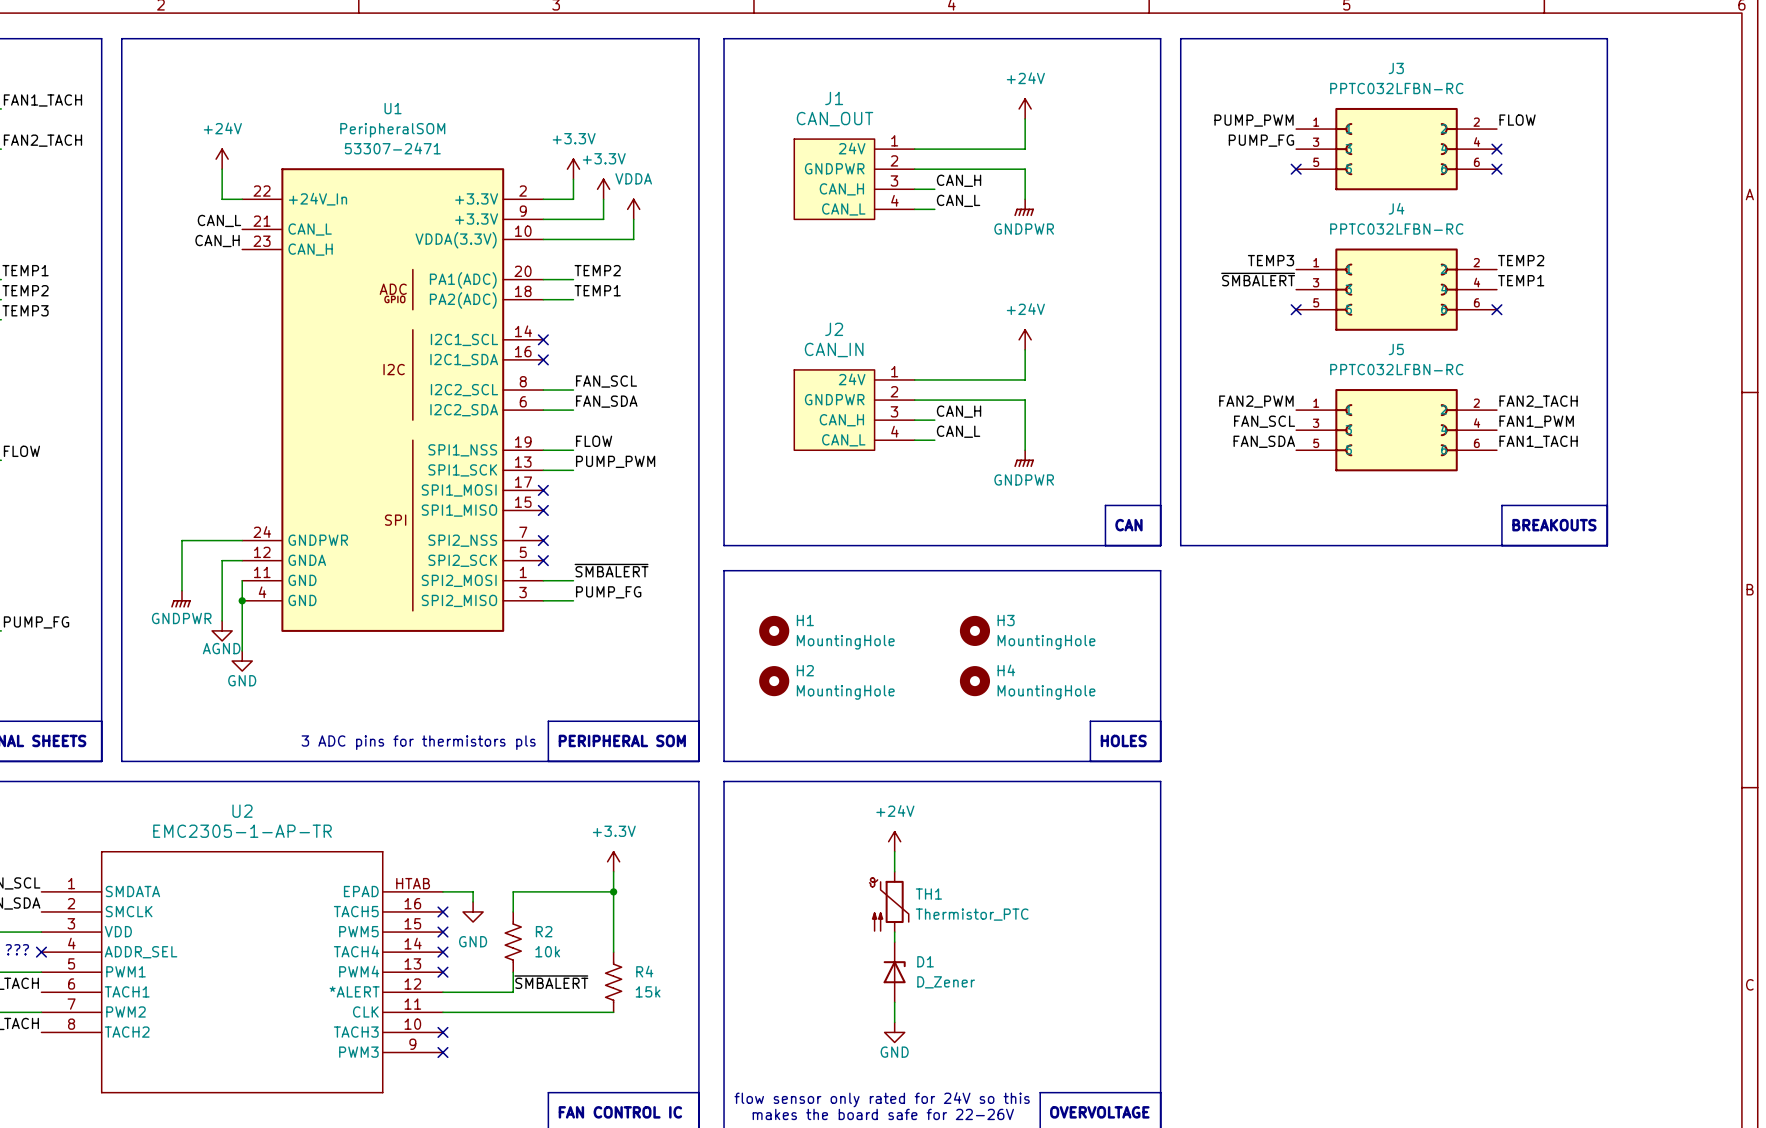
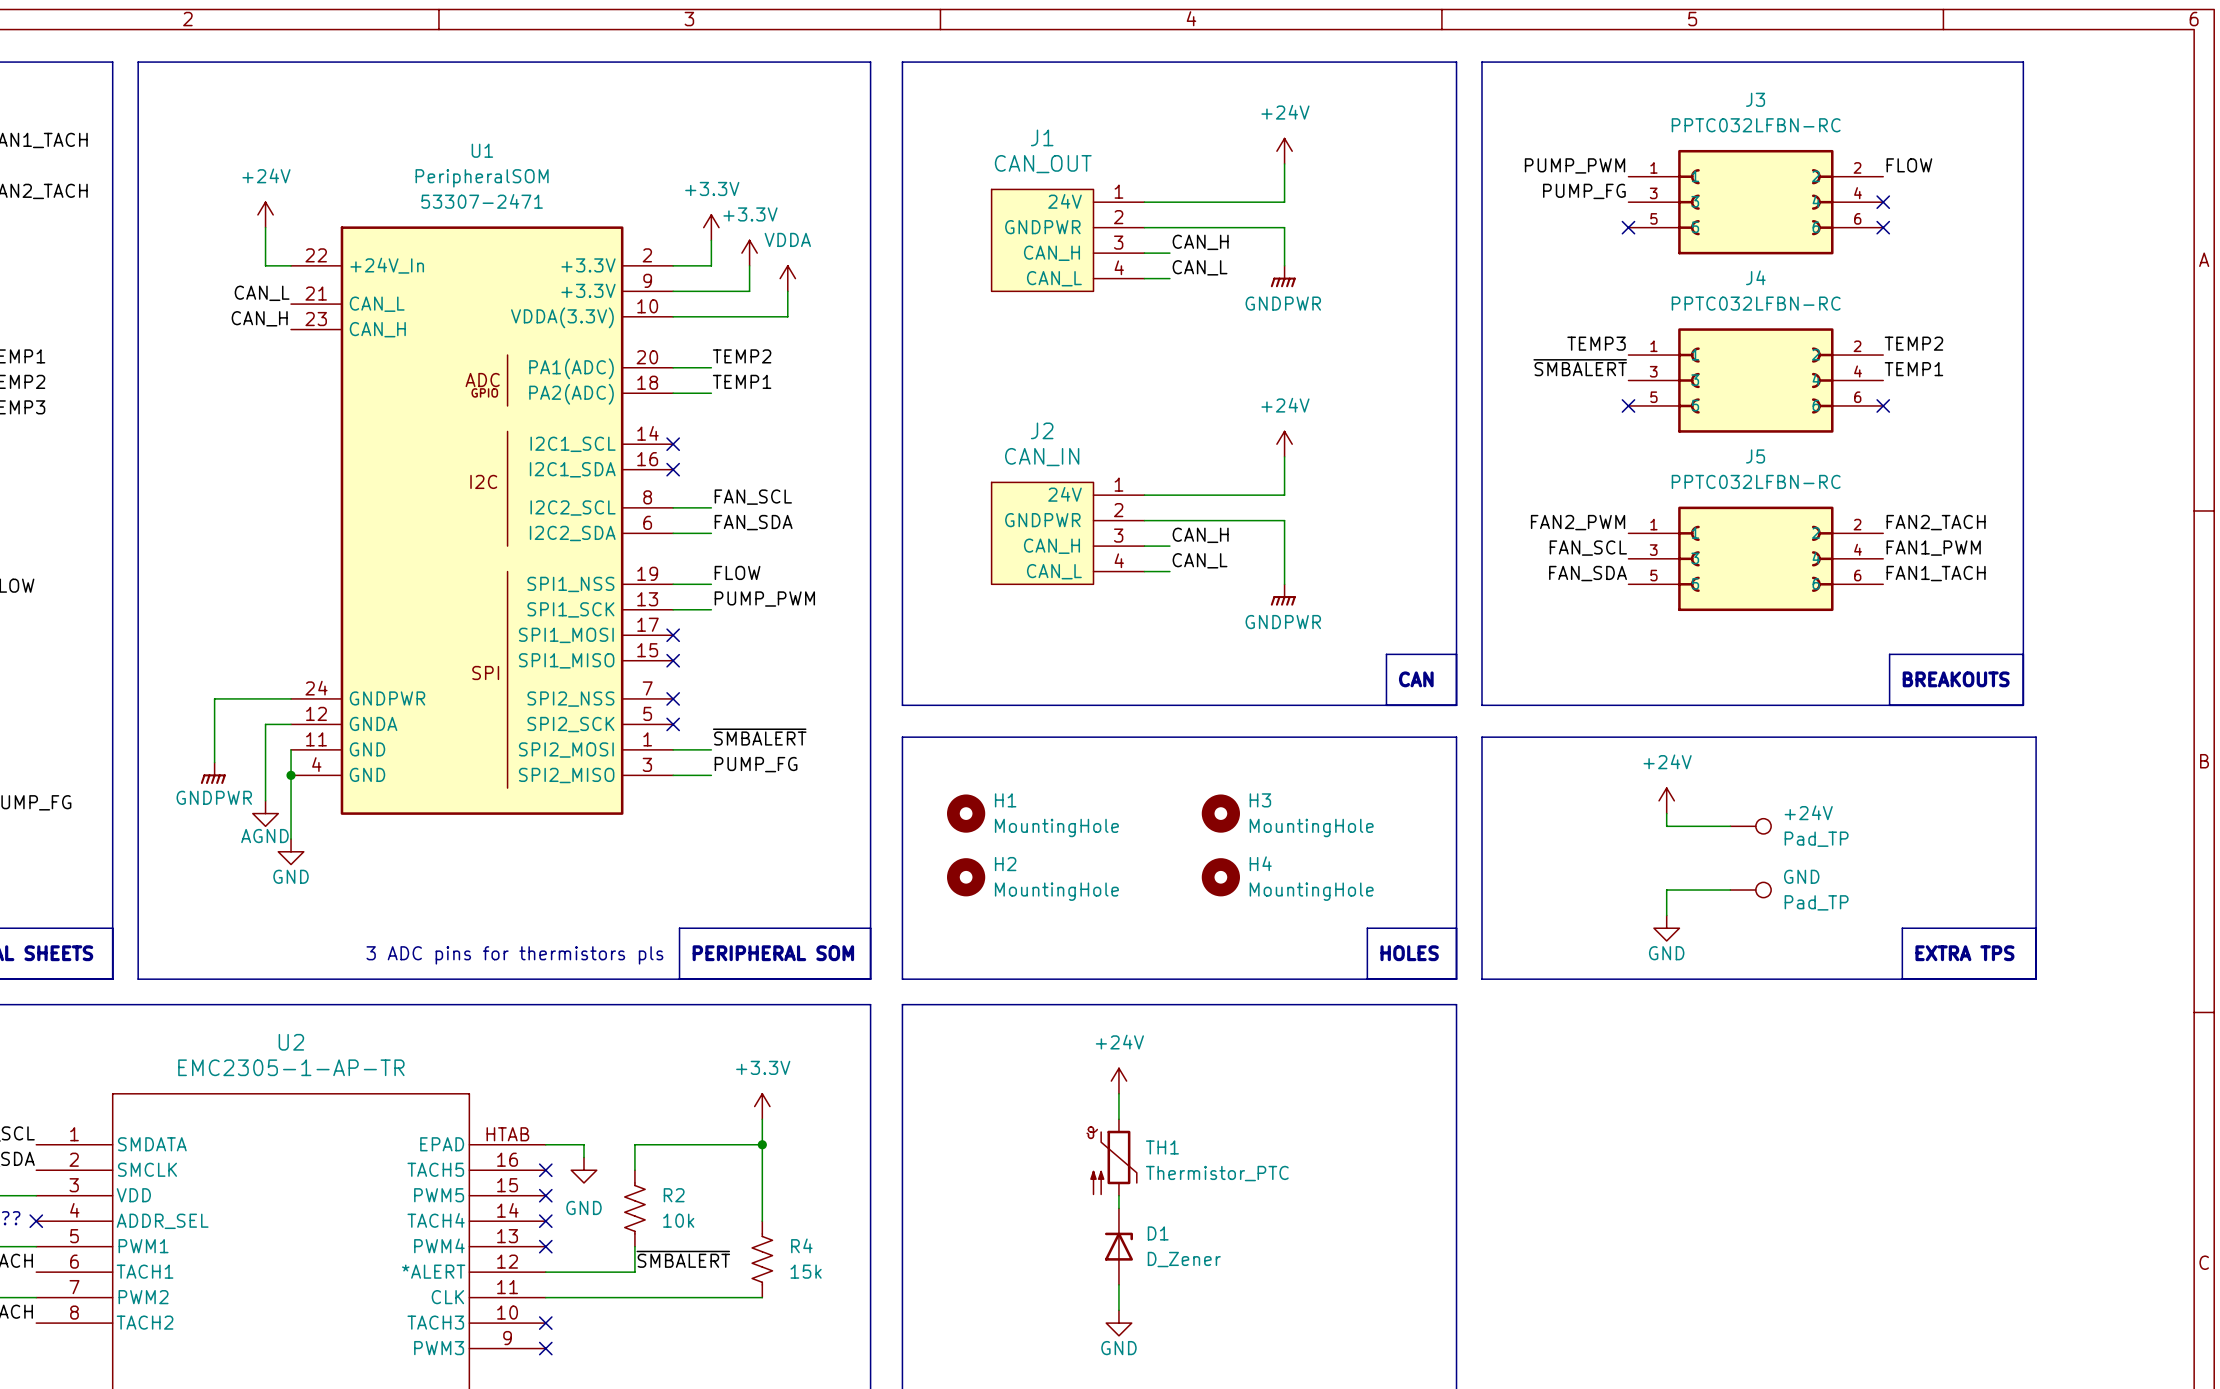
line: none -> (1481, 737) (2036, 737) (2036, 979) (1481, 979) (1481, 737)
power symbol: none -> +24V (1666, 800)
wire: none -> (1666, 813) (1666, 826) (1730, 826)
+24V: none -> Pad_TP (1750, 826)
wire: none -> (1730, 890) (1666, 890) (1666, 915)
GND: none -> Pad_TP (1750, 890)
power symbol: none -> GND (1666, 928)
line: none -> (2036, 928) (1902, 928) (1902, 979)
text: none -> EXTRA TPS (1964, 953)

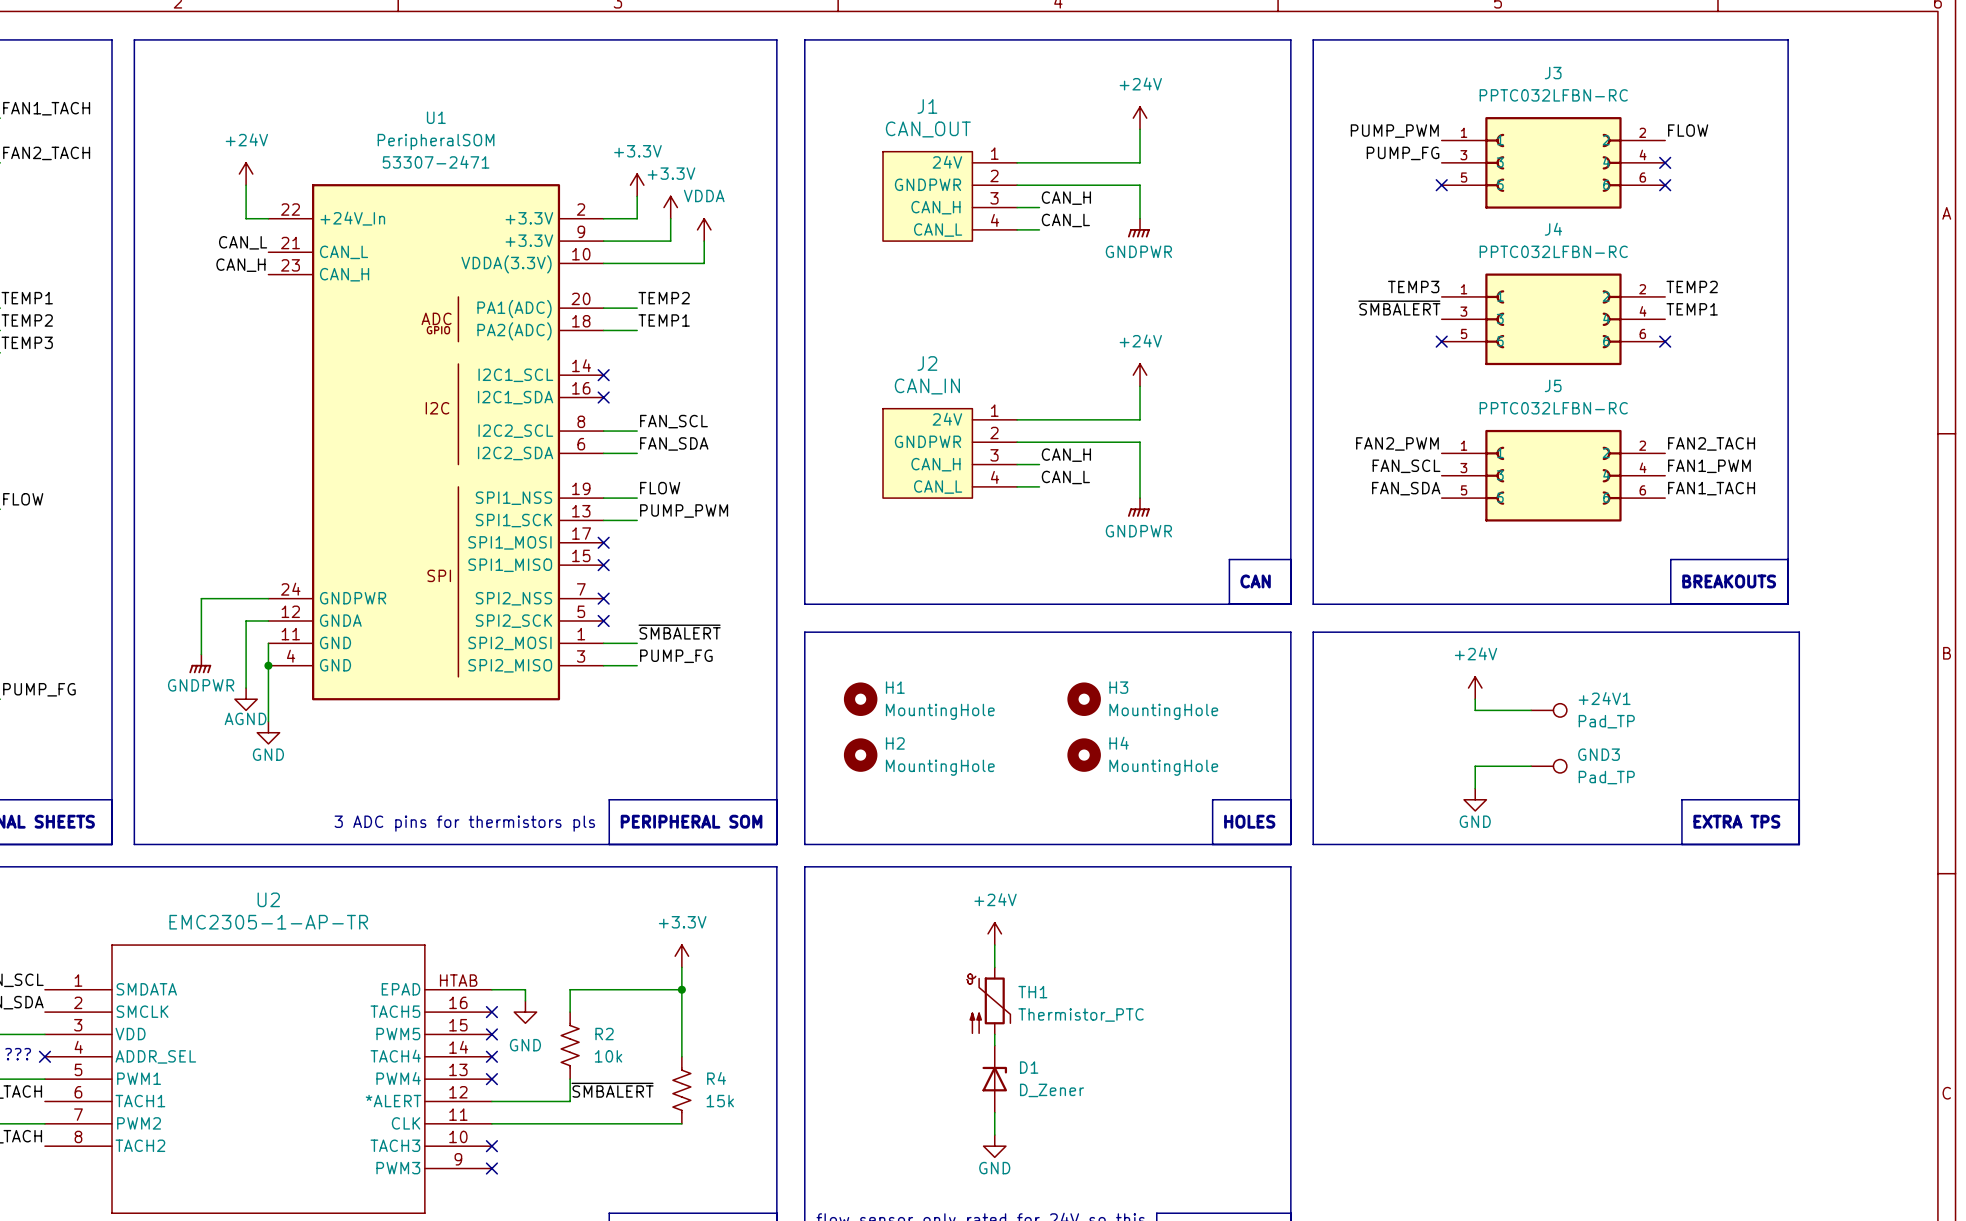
+24V name: +24V (1808, 812) -> +24V1 (1604, 698)
GND name: GND (1801, 876) -> GND3 (1599, 754)

